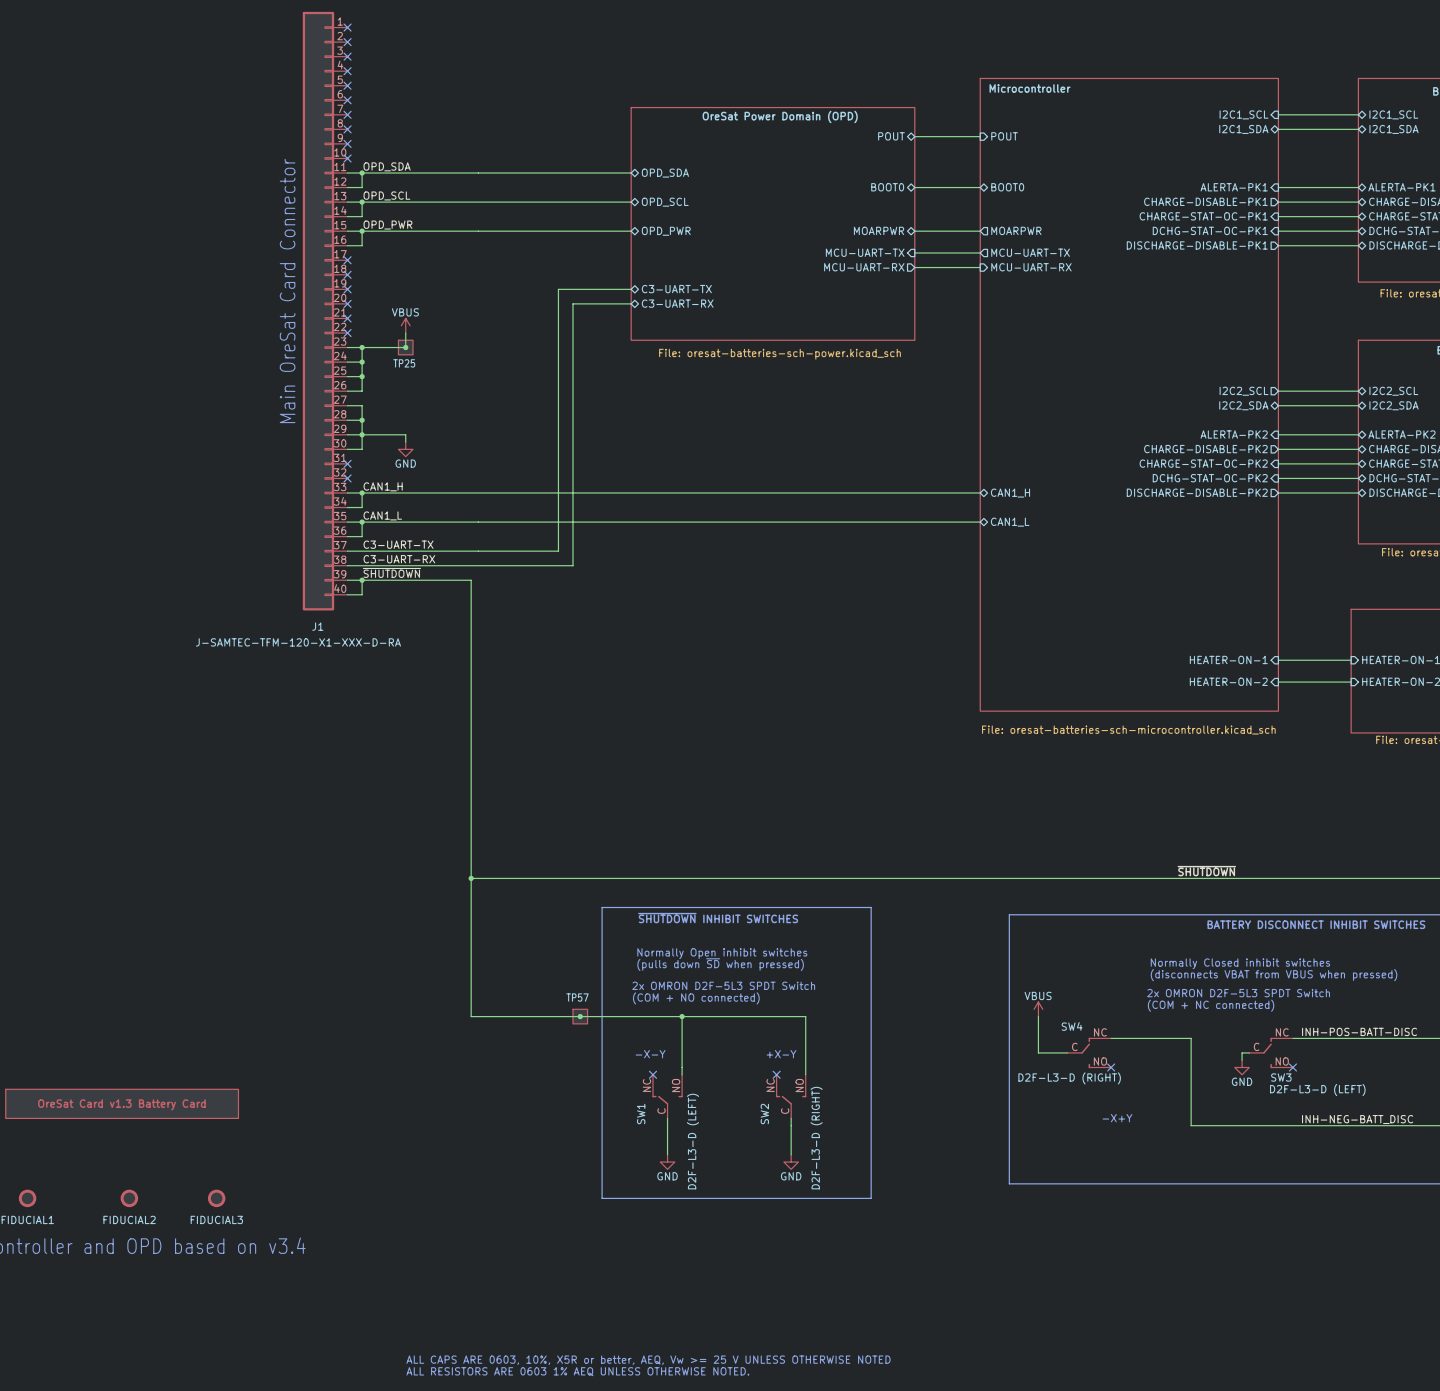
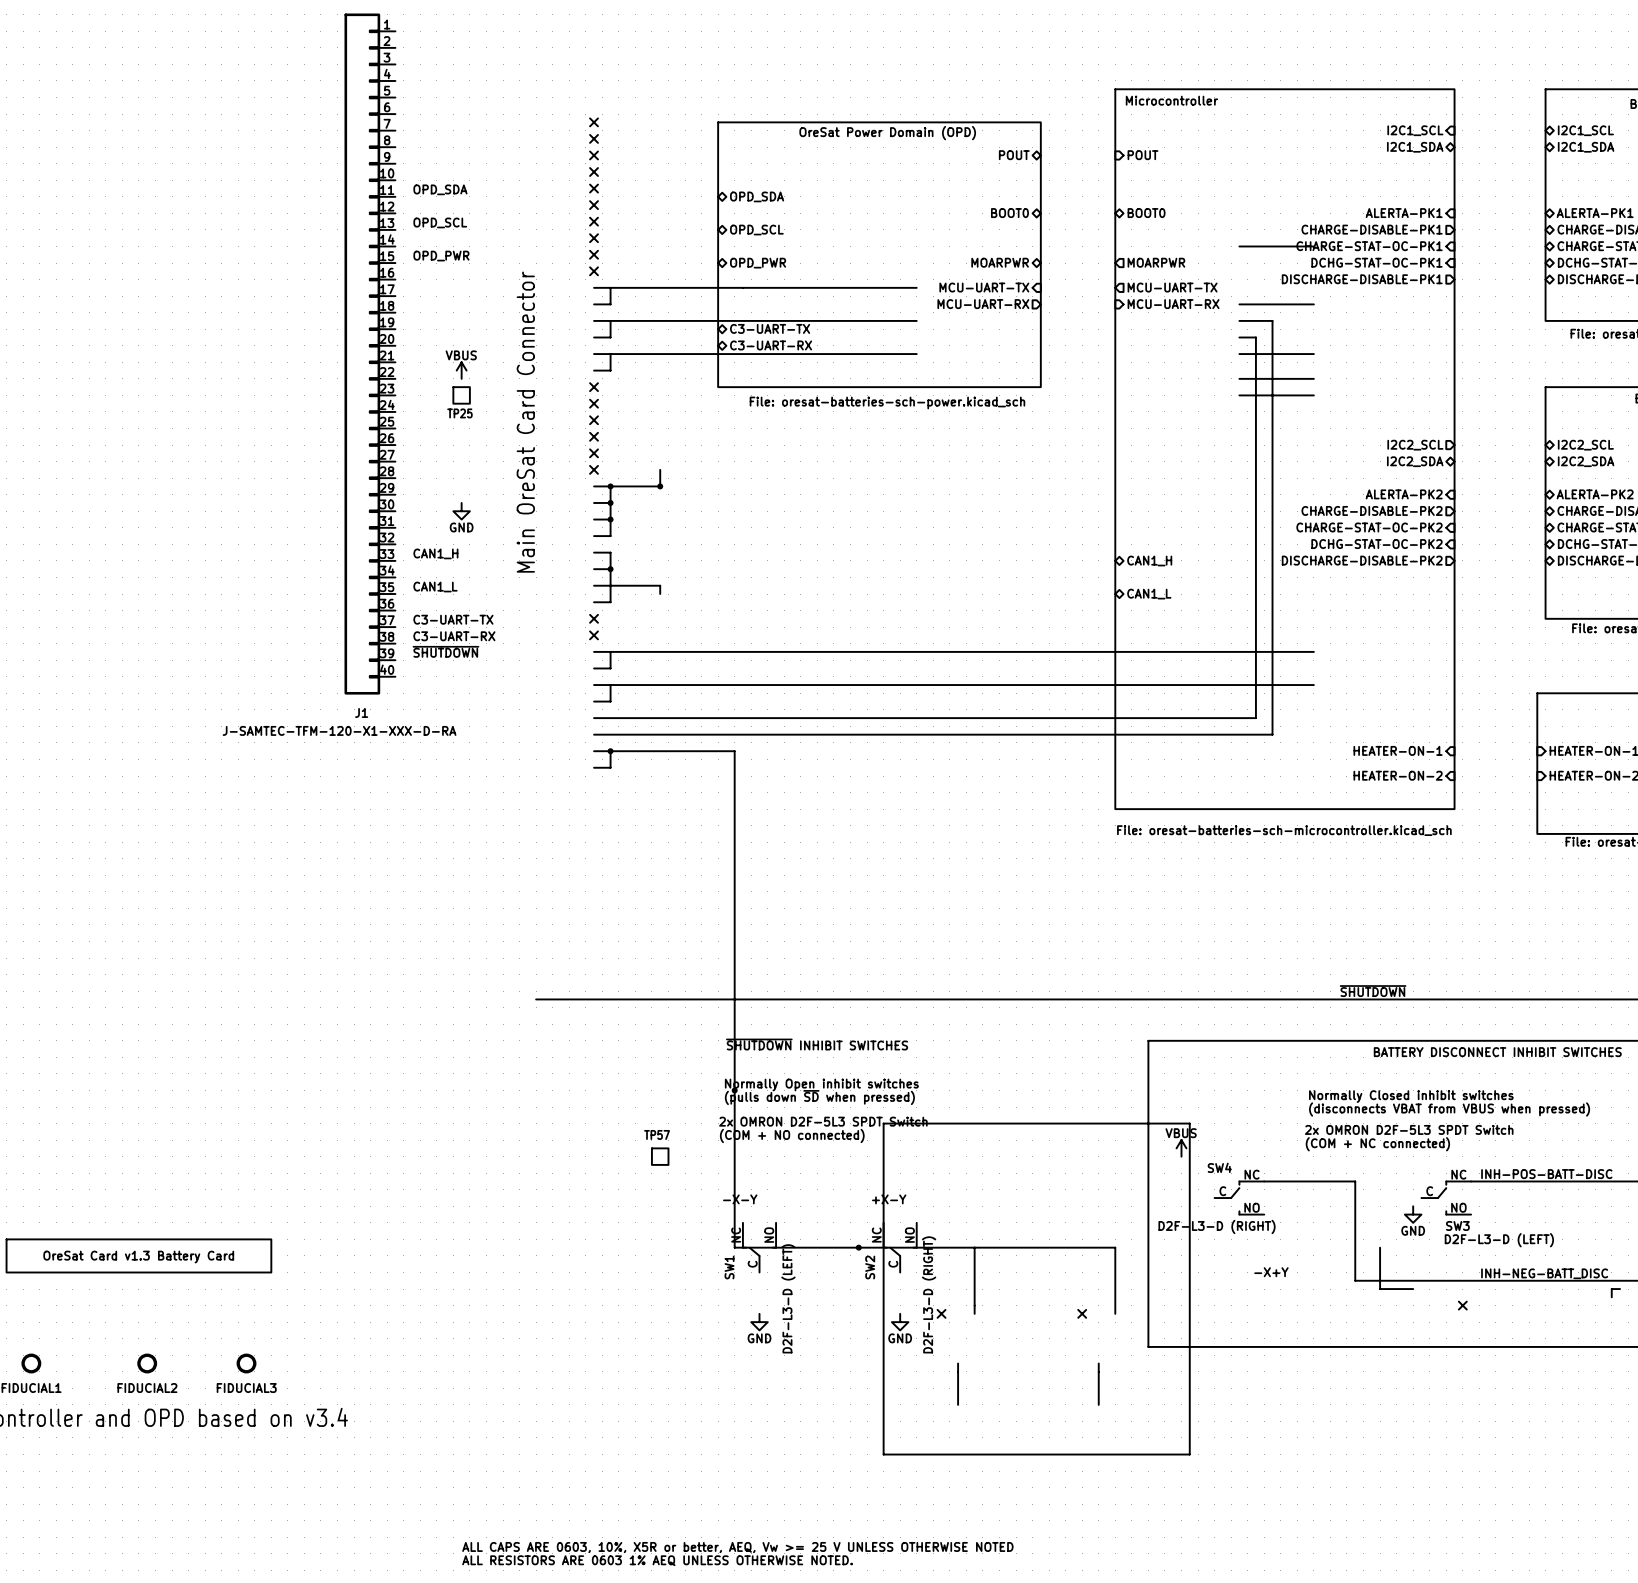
no-connect mark: (347, 27) -> none
no-connect mark: (347, 42) -> none
no-connect mark: (347, 56) -> none
no-connect mark: (347, 71) -> none
no-connect mark: (347, 85) -> none
no-connect mark: (347, 100) -> none
no-connect mark: none -> (594, 122)
no-connect mark: (347, 114) -> none
wire: (1278, 114) (1358, 114) -> none
no-connect mark: none -> (594, 138)
no-connect mark: (347, 129) -> none
wire: (1278, 129) (1358, 129) -> none
no-connect mark: none -> (594, 155)
wire: (914, 136) (980, 136) -> none
no-connect mark: (347, 143) -> none
no-connect mark: none -> (594, 172)
no-connect mark: (347, 158) -> none
no-connect mark: none -> (594, 188)
wire: (347, 173) (631, 173) -> none
wire: (362, 173) (362, 187) (347, 187) -> none
junction: (362, 173) -> none
no-connect mark: none -> (594, 205)
wire: (914, 187) (980, 187) -> none
wire: (1278, 187) (1358, 187) -> none
no-connect mark: none -> (594, 221)
wire: (347, 202) (631, 202) -> none
wire: (362, 202) (362, 216) (347, 216) -> none
junction: (362, 202) -> none
wire: (1278, 202) (1358, 202) -> none
no-connect mark: none -> (594, 238)
wire: none -> (1239, 246) (1313, 246)
wire: (1278, 216) (1358, 216) -> none
no-connect mark: none -> (594, 254)
wire: (347, 231) (631, 231) -> none
wire: (362, 231) (362, 245) (347, 245) -> none
junction: (362, 231) -> none
wire: (914, 231) (980, 231) -> none
wire: (1278, 231) (1358, 231) -> none
no-connect mark: none -> (594, 271)
wire: (1278, 245) (1358, 245) -> none
wire: none -> (594, 287) (916, 287)
wire: none -> (610, 287) (610, 304) (594, 304)
wire: (914, 252) (980, 252) -> none
no-connect mark: (347, 260) -> none
wire: (914, 267) (980, 267) -> none
wire: none -> (1239, 304) (1313, 304)
no-connect mark: (347, 274) -> none
wire: none -> (594, 320) (916, 320)
wire: none -> (610, 320) (610, 337) (594, 337)
wire: none -> (1239, 320) (1272, 320) (1272, 734) (594, 734)
no-connect mark: (347, 289) -> none
wire: (631, 289) (558, 289) (558, 551) (347, 551) -> none
text: Main OreSat Card Connector (287, 291) -> none
wire: none -> (1239, 337) (1255, 337) (1255, 718) (594, 718)
no-connect mark: (347, 303) -> none
wire: (631, 303) (572, 303) (572, 565) (347, 565) -> none
wire: none -> (594, 354) (916, 354)
wire: none -> (610, 354) (610, 370) (594, 370)
wire: none -> (1239, 354) (1313, 354)
no-connect mark: (347, 318) -> none
no-connect mark: (347, 332) -> none
wire: (405, 332) (405, 347) (347, 347) -> none
wire: none -> (1239, 378) (1313, 378)
no-connect mark: none -> (594, 387)
wire: (362, 347) (362, 391) (347, 391) -> none
junction: (362, 347) -> none
junction: (405, 347) -> none
wire: none -> (1239, 395) (1313, 395)
no-connect mark: none -> (594, 403)
wire: (347, 362) (362, 362) -> none
junction: (362, 362) -> none
no-connect mark: none -> (594, 420)
text: none -> Main OreSat Card Connector (525, 422)
wire: (347, 376) (362, 376) -> none
junction: (362, 376) -> none
no-connect mark: none -> (594, 436)
wire: (1278, 391) (1358, 391) -> none
no-connect mark: none -> (594, 453)
wire: (347, 405) (362, 405) (362, 449) (347, 449) -> none
wire: (1278, 405) (1358, 405) -> none
no-connect mark: none -> (594, 469)
wire: none -> (660, 469) (660, 486) (594, 486)
wire: (347, 420) (362, 420) -> none
junction: (362, 420) -> none
wire: none -> (610, 486) (610, 536) (594, 536)
junction: none -> (610, 486)
junction: none -> (660, 486)
wire: (347, 434) (405, 434) (405, 442) -> none
junction: (362, 434) -> none
wire: (1278, 434) (1358, 434) -> none
wire: none -> (594, 502) (610, 502)
junction: none -> (610, 502)
wire: (1278, 449) (1358, 449) -> none
wire: none -> (594, 519) (610, 519)
junction: none -> (610, 519)
no-connect mark: (347, 463) -> none
wire: (1278, 463) (1358, 463) -> none
no-connect mark: (347, 478) -> none
wire: (1278, 478) (1358, 478) -> none
wire: none -> (594, 552) (610, 552) (610, 602) (594, 602)
wire: (347, 492) (980, 492) -> none
wire: (362, 492) (362, 507) (347, 507) -> none
junction: (362, 492) -> none
wire: (1278, 492) (1358, 492) -> none
wire: none -> (594, 569) (610, 569)
junction: none -> (610, 569)
wire: none -> (594, 585) (660, 585) (660, 594)
wire: (347, 522) (980, 522) -> none
wire: (362, 522) (362, 536) (347, 536) -> none
junction: (362, 522) -> none
no-connect mark: none -> (594, 618)
no-connect mark: none -> (594, 635)
wire: none -> (594, 651) (1313, 651)
wire: none -> (610, 651) (610, 668) (594, 668)
wire: (347, 580) (471, 580) (471, 1016) (805, 1016) (805, 1074) -> none
wire: (362, 580) (362, 594) (347, 594) -> none
junction: (362, 580) -> none
wire: none -> (594, 685) (1313, 685)
wire: none -> (610, 685) (610, 701) (594, 701)
wire: none -> (594, 751) (734, 751) (734, 1247) (1115, 1247) (1115, 1313)
wire: none -> (610, 751) (610, 767) (594, 767)
junction: none -> (610, 751)
wire: (1278, 660) (1351, 660) -> none
wire: (1278, 682) (1351, 682) -> none
junction: (471, 878) -> none
line: (602, 907) (871, 907) (871, 1198) (602, 1198) (602, 907) -> none
junction: none -> (734, 1090)
line: none -> (883, 1123) (883, 1454) (1189, 1454) (1189, 1123) (883, 1123)
junction: (580, 1016) -> none
wire: (682, 1016) (682, 1074) -> none
junction: (682, 1016) -> none
wire: (1038, 1016) (1038, 1052) (1067, 1052) -> none
wire: (1249, 1052) (1242, 1052) (1242, 1060) -> none
no-connect mark: (1111, 1067) -> none
no-connect mark: (1292, 1067) -> none
no-connect mark: (652, 1074) -> none
no-connect mark: (776, 1074) -> none
junction: none -> (858, 1247)
wire: none -> (974, 1247) (974, 1313)
wire: none -> (1380, 1247) (1380, 1289) (1413, 1289)
wire: (667, 1118) (667, 1154) -> none
wire: (791, 1118) (791, 1154) -> (958, 1363) (958, 1404)
wire: none -> (1620, 1289) (1611, 1289) (1611, 1297)
no-connect mark: none -> (1462, 1305)
no-connect mark: none -> (941, 1313)
no-connect mark: none -> (1082, 1313)
wire: none -> (1098, 1363) (1098, 1404)

